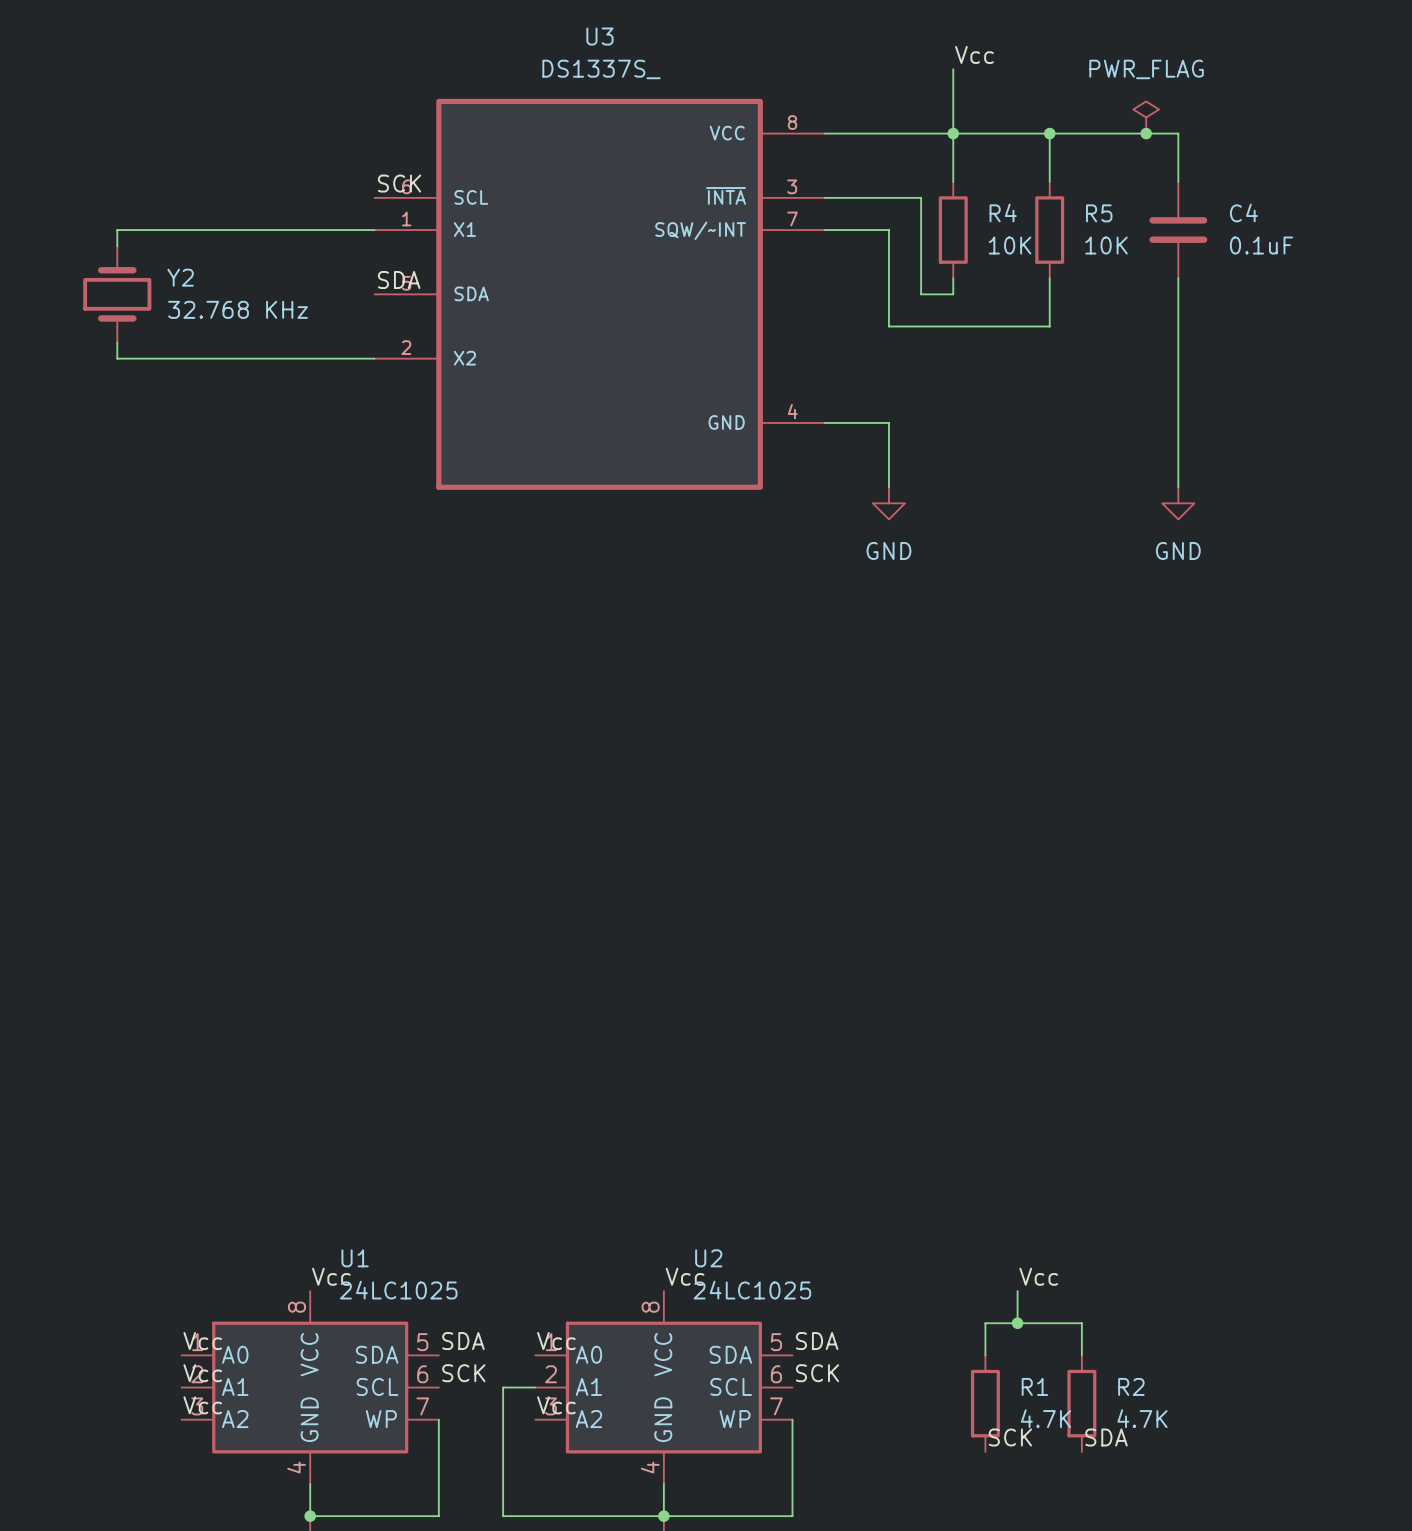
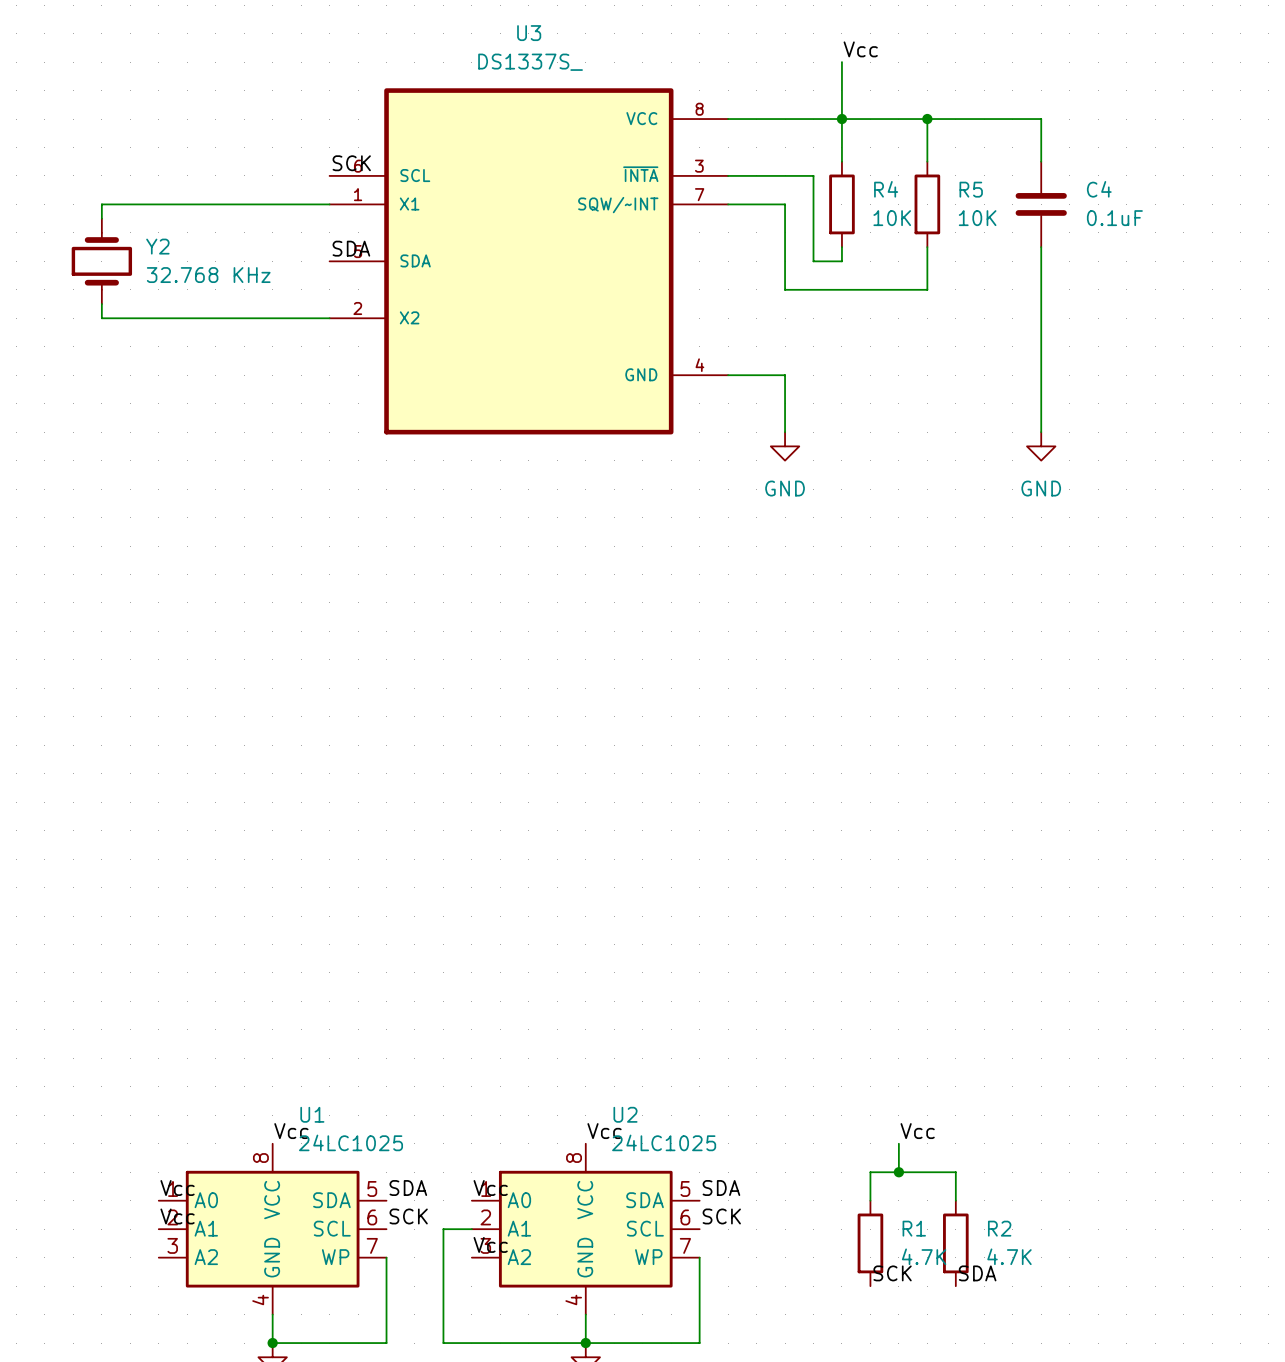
power symbol: PWR_FLAG (1146, 117) -> none
junction: (1146, 133) -> none
label: Vcc (202, 1405) -> none

